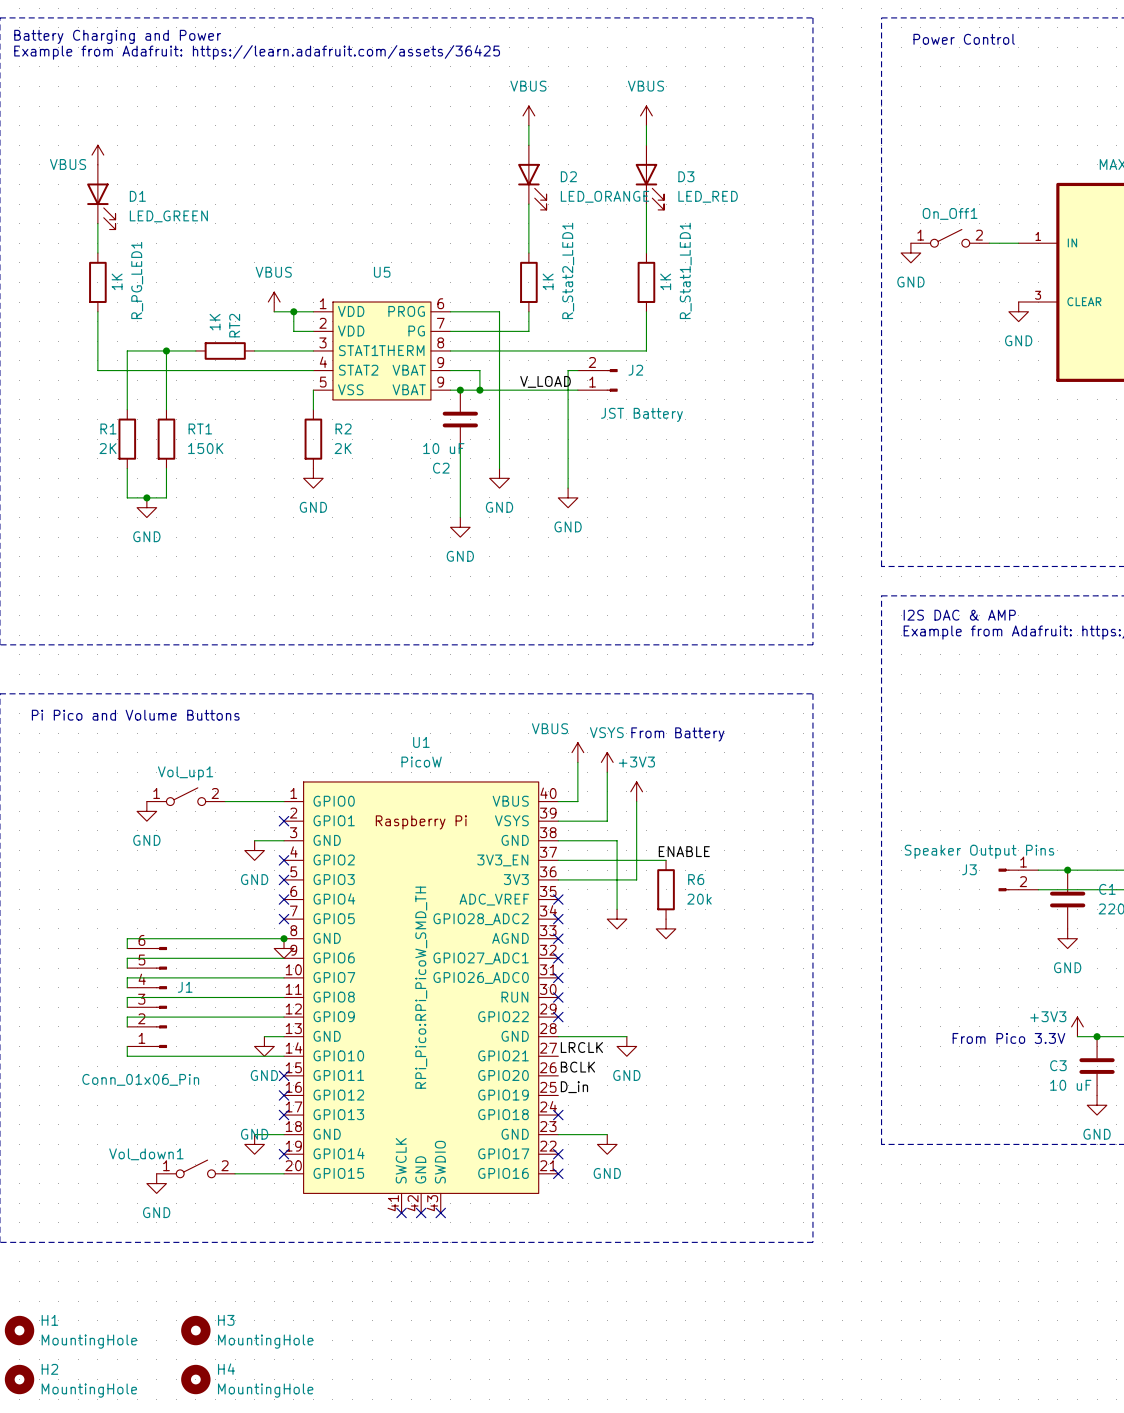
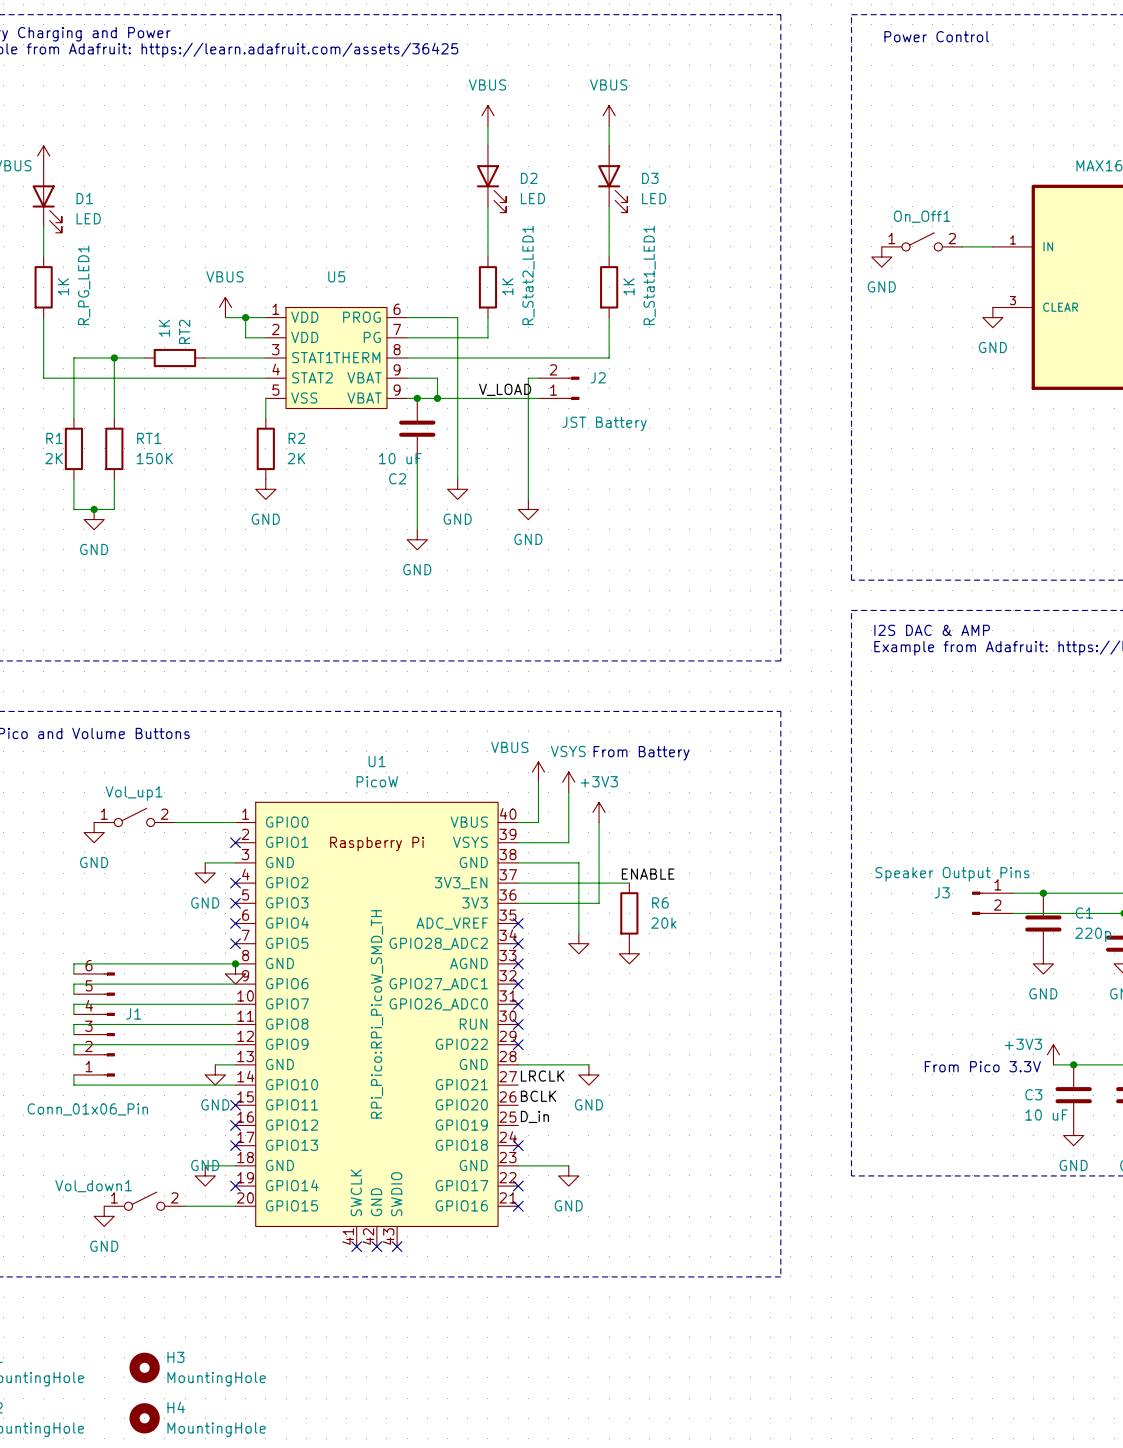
D2 value: LED_ORANGE (605, 196) -> LED (533, 198)
D3 value: LED_RED (708, 196) -> LED (654, 198)
D1 value: LED_GREEN (168, 216) -> LED (88, 218)

